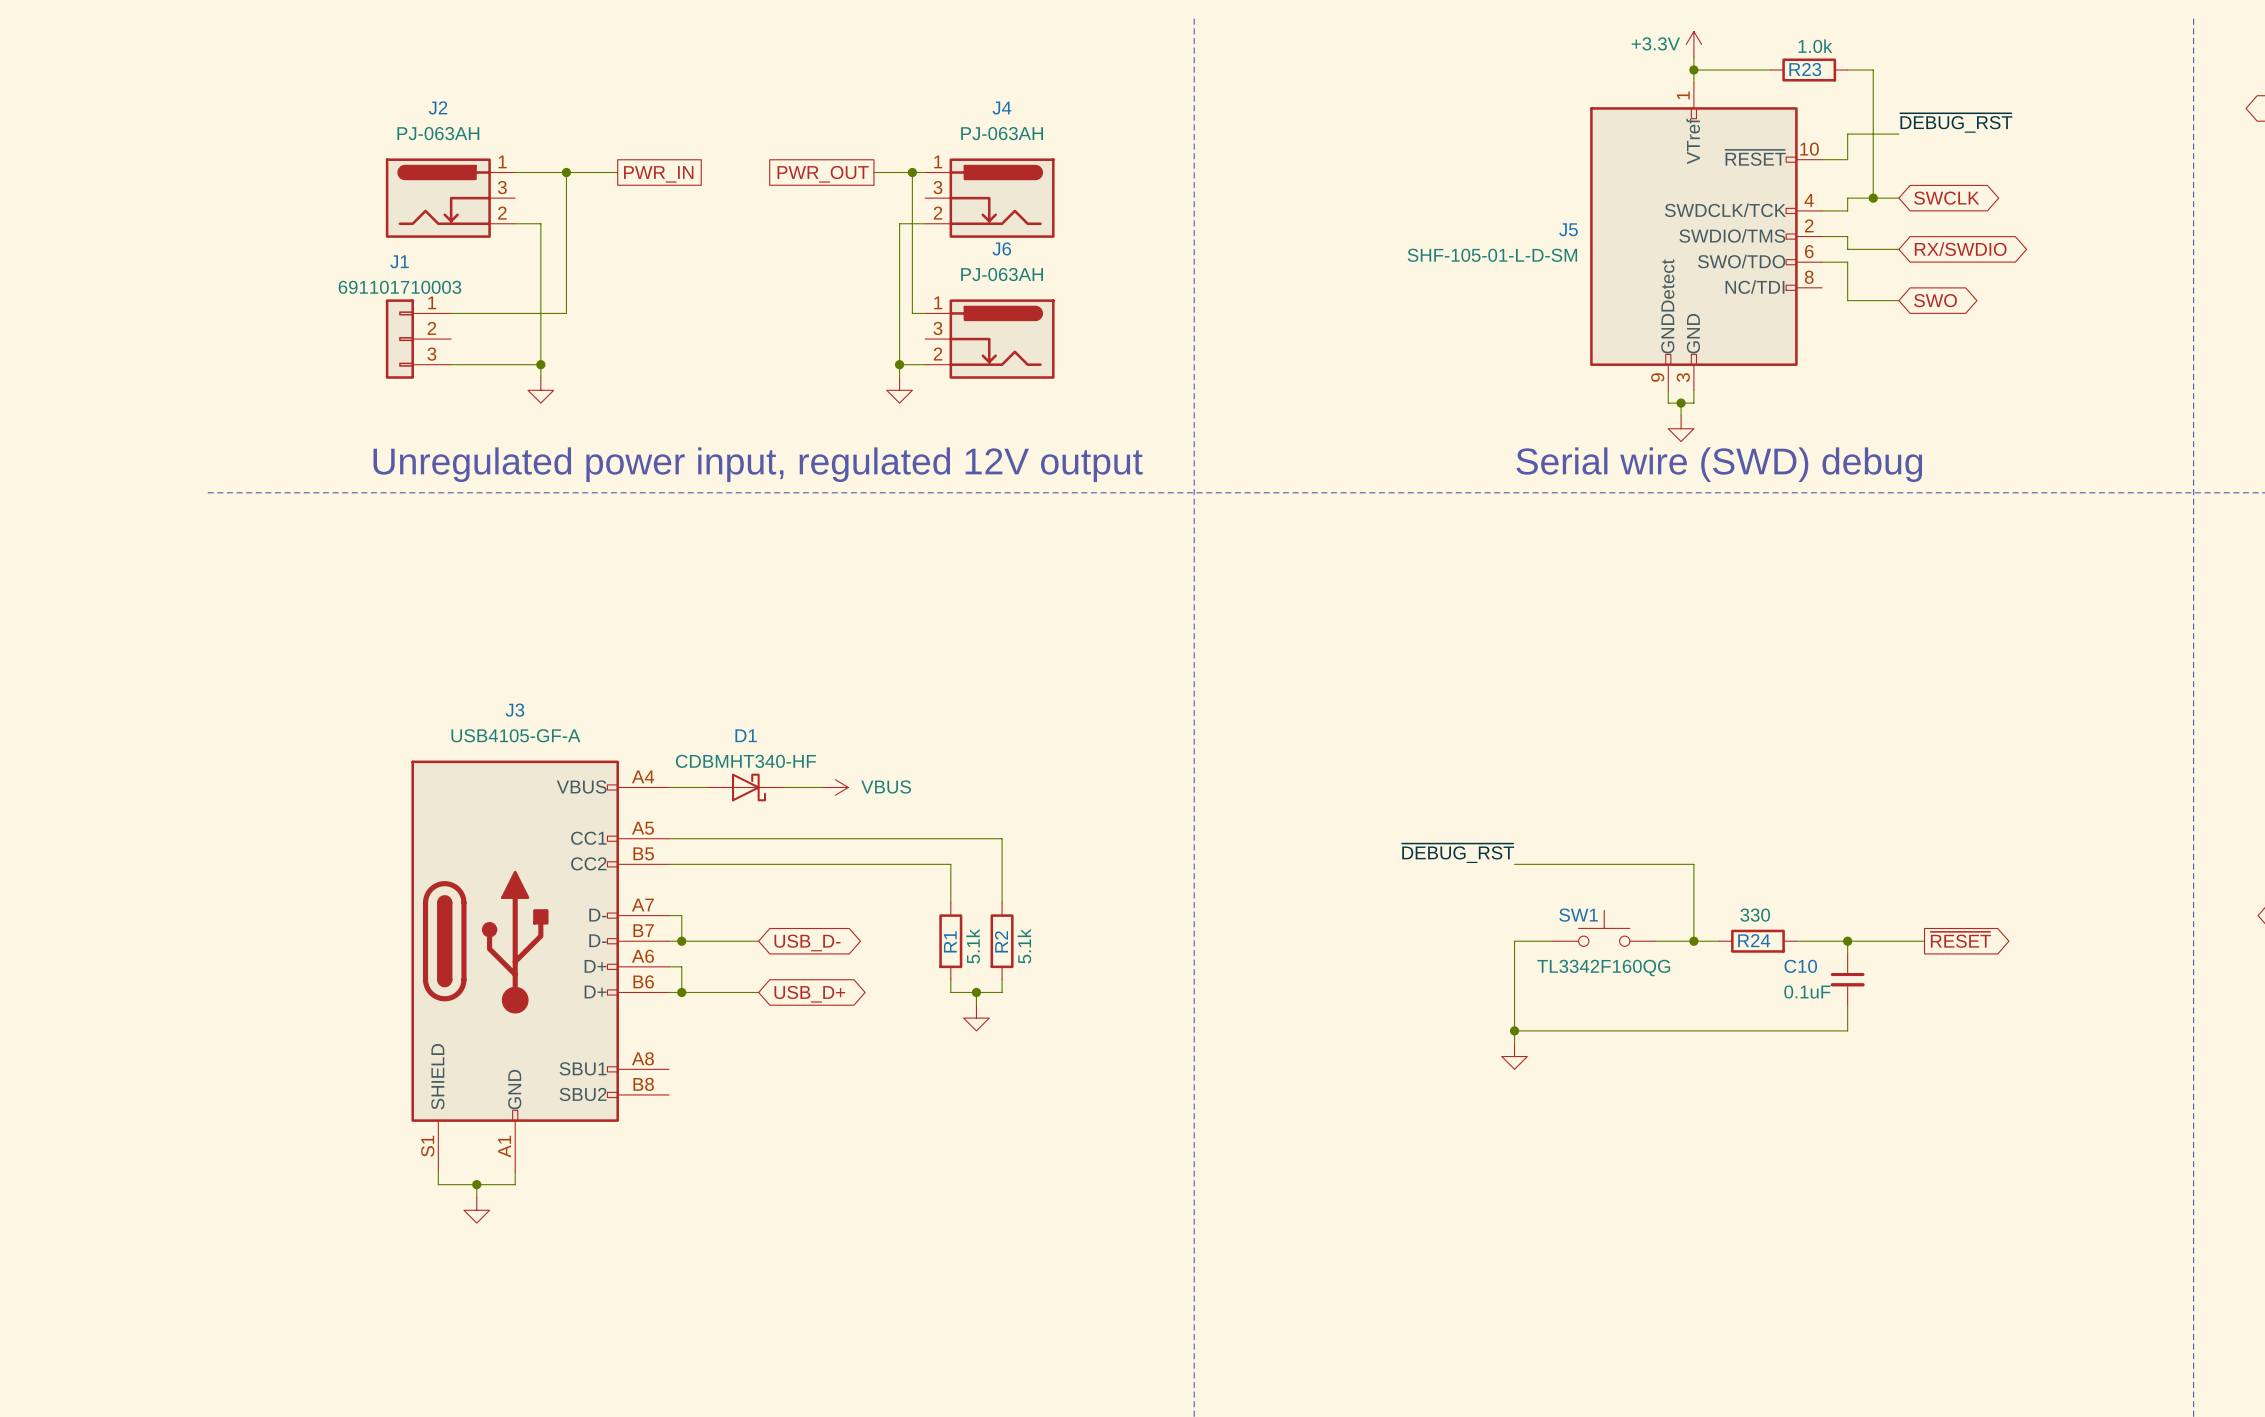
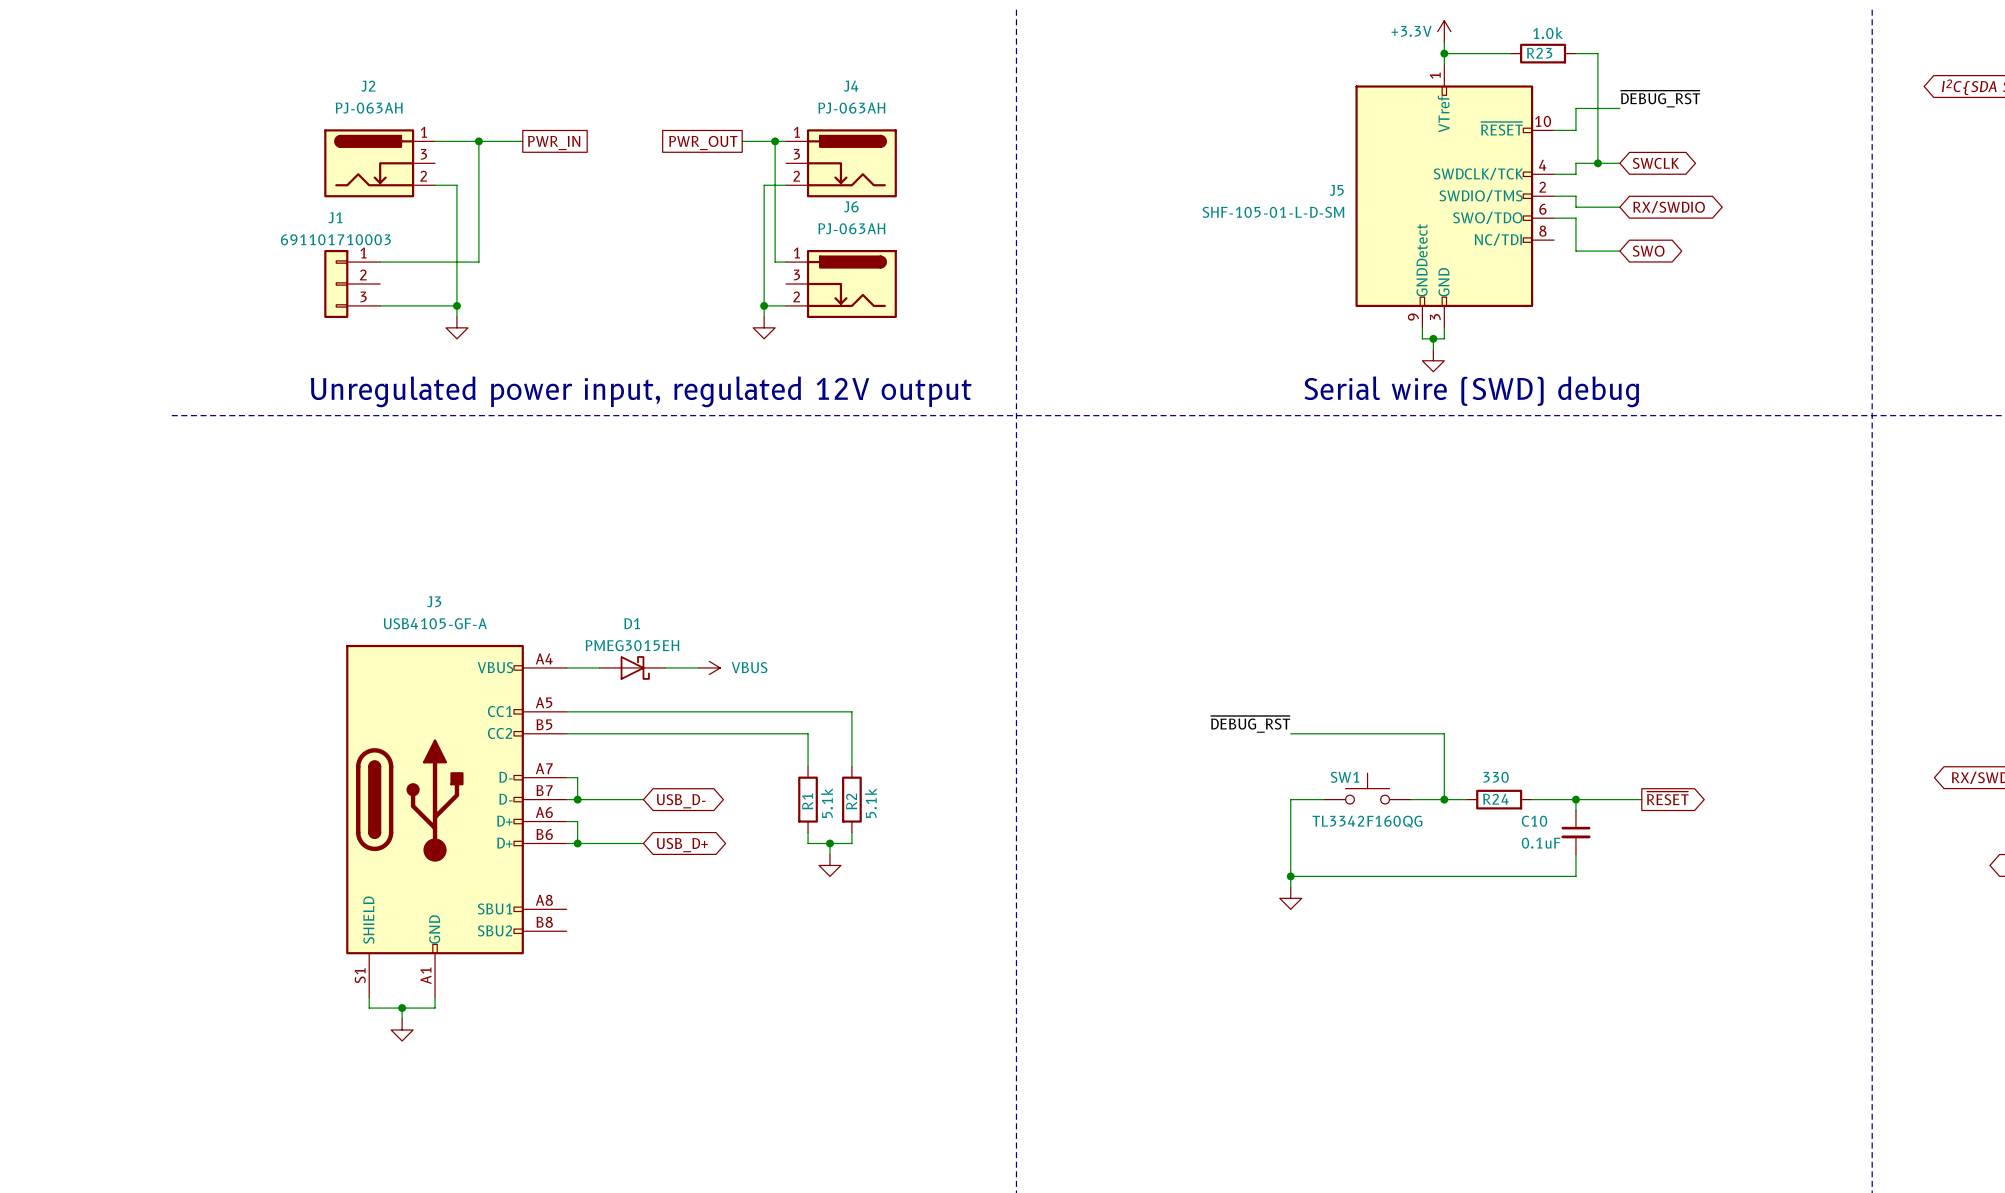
D1 value: CDBMHT340-HF (745, 761) -> PMEG3015EH (632, 645)

